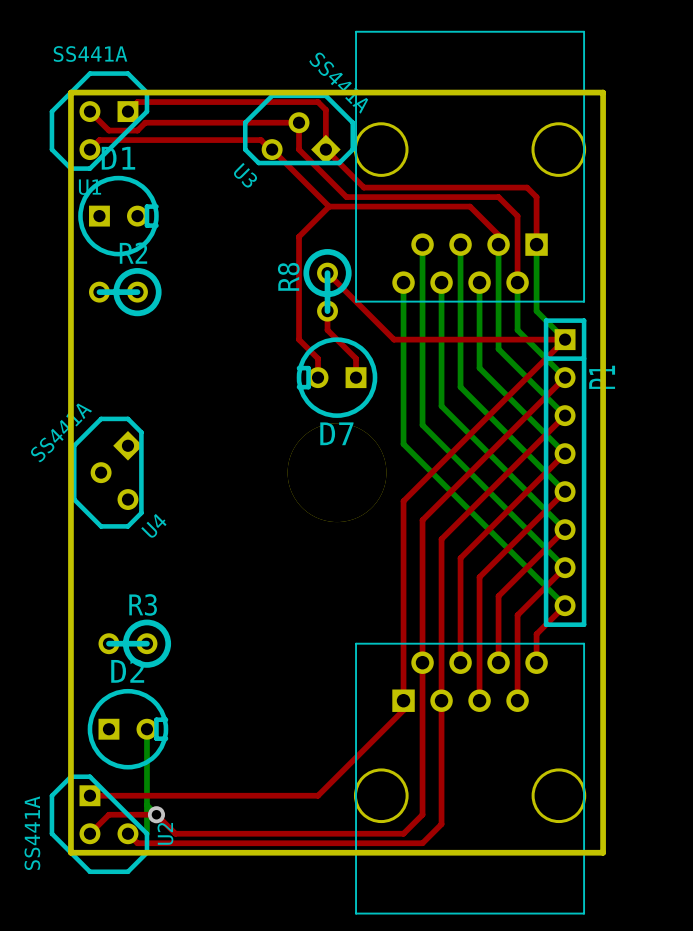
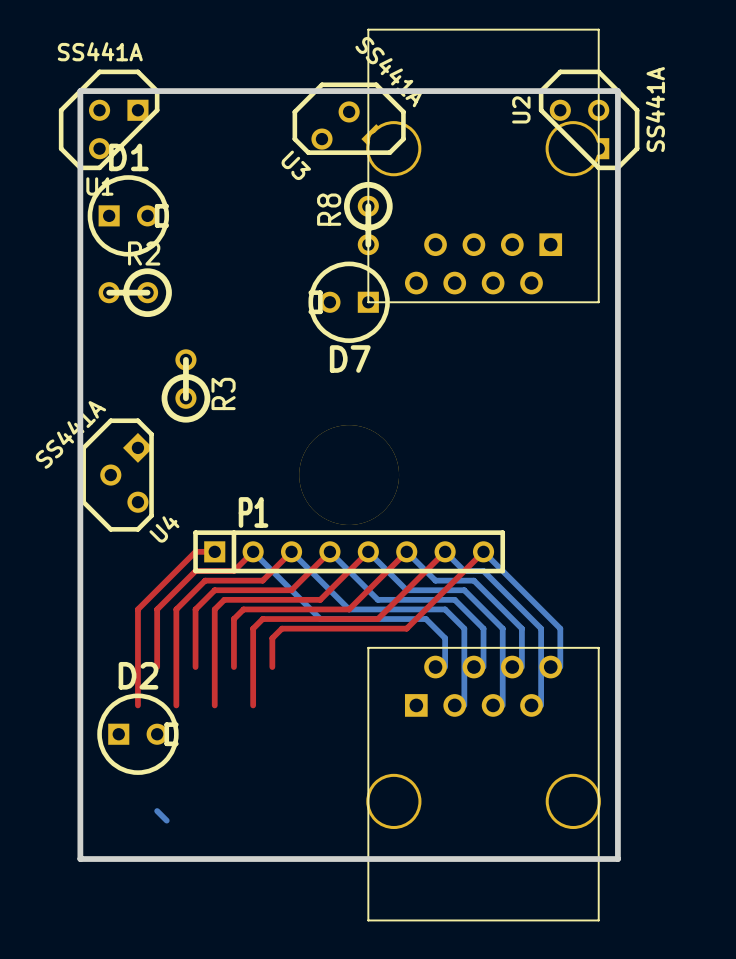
top track: (89, 111) (108, 130) (137, 130) (145, 122) (299, 122) (299, 149) (346, 197) (498, 197) (517, 216) (517, 282) -> none
top track: (127, 111) (137, 102) (318, 102) (325, 109) (325, 149) (363, 187) (527, 187) (536, 197) (536, 244) -> none
U3 position: (299, 129) -> (349, 118)
top track: (89, 149) (99, 140) (261, 140) (329, 206) -> none
top track: (329, 206) (299, 236) (299, 339) (318, 358) (318, 377) -> none
top track: (329, 206) (470, 206) (498, 235) (498, 244) -> none
bottom track: (422, 244) (422, 425) (565, 567) -> none
bottom track: (460, 244) (460, 387) (565, 491) -> none
bottom track: (498, 244) (498, 349) (565, 415) -> none
bottom track: (536, 244) (536, 311) (565, 339) -> none
top track: (327, 273) (394, 339) (565, 339) (403, 501) (403, 710) (318, 795) (89, 795) -> none
bottom track: (403, 282) (403, 444) (565, 605) -> none
bottom track: (441, 282) (441, 406) (565, 529) -> none
bottom track: (479, 282) (479, 368) (565, 453) -> none
bottom track: (517, 282) (517, 330) (565, 377) -> none
R8 position: (327, 285) -> (368, 218)
top track: (327, 311) (327, 330) (356, 358) (356, 377) -> none
D7 position: (337, 377) -> (349, 302)
top track: (565, 377) (422, 520) (422, 814) (403, 833) (175, 833) (156, 814) (108, 814) (89, 833) -> none
top track: (565, 415) (441, 539) (441, 824) (422, 843) (137, 843) (127, 833) -> none
top track: (565, 453) (470, 548) -> none
P1 rotation: 0° (565, 472) -> 90° counterclockwise (349, 551)
P1 position: (565, 472) -> (349, 551)
top track: (565, 491) (479, 577) (479, 700) -> none
top track: (565, 529) (498, 596) (498, 662) -> none
top track: none -> (214, 551) (195, 551) (137, 609) (137, 705)
top track: none -> (253, 551) (233, 571) (195, 571) (157, 609) (157, 667)
bottom track: none -> (253, 551) (320, 619) (425, 619) (445, 638) (445, 667)
top track: none -> (291, 551) (262, 580) (205, 580) (176, 609) (176, 705)
bottom track: none -> (291, 551) (349, 609) (445, 609) (464, 628) (464, 705)
top track: none -> (329, 551) (291, 590) (214, 590) (195, 609) (195, 667)
bottom track: none -> (329, 551) (377, 599) (454, 599) (483, 628) (483, 667)
top track: none -> (368, 551) (320, 599) (224, 599) (214, 609) (214, 705)
bottom track: none -> (368, 551) (406, 590) (464, 590) (502, 628) (502, 705)
top track: none -> (406, 551) (349, 609) (243, 609) (233, 619) (233, 667)
bottom track: none -> (406, 551) (435, 580) (473, 580) (521, 628) (521, 667)
top track: none -> (445, 551) (377, 619) (262, 619) (253, 628) (253, 705)
bottom track: none -> (445, 551) (464, 571) (483, 571) (541, 628) (541, 705)
bottom track: none -> (483, 551) (560, 628) (560, 667)
top track: (460, 558) (460, 662) -> (473, 561) (406, 628) (281, 628) (272, 638) (272, 667)
top track: (565, 567) (517, 615) (517, 700) -> none
top track: (565, 605) (536, 634) (536, 662) -> none
R3 rotation: 0° (134, 643) -> 90° clockwise (185, 385)
R3 position: (134, 643) -> (185, 385)
bottom track: (146, 729) (146, 833) -> none
via: (156, 814) -> none
U2 rotation: 0° (99, 824) -> 180° (589, 119)
U2 position: (99, 824) -> (589, 119)

